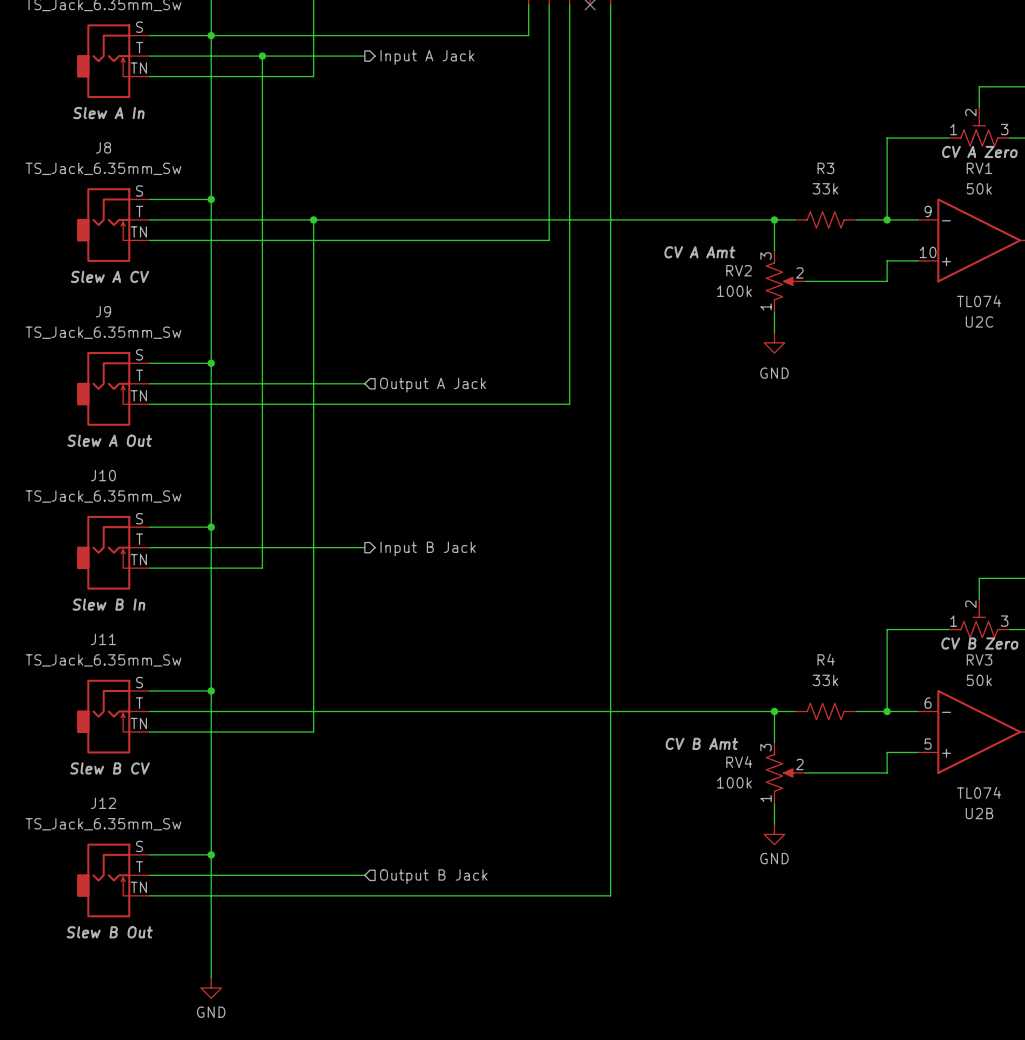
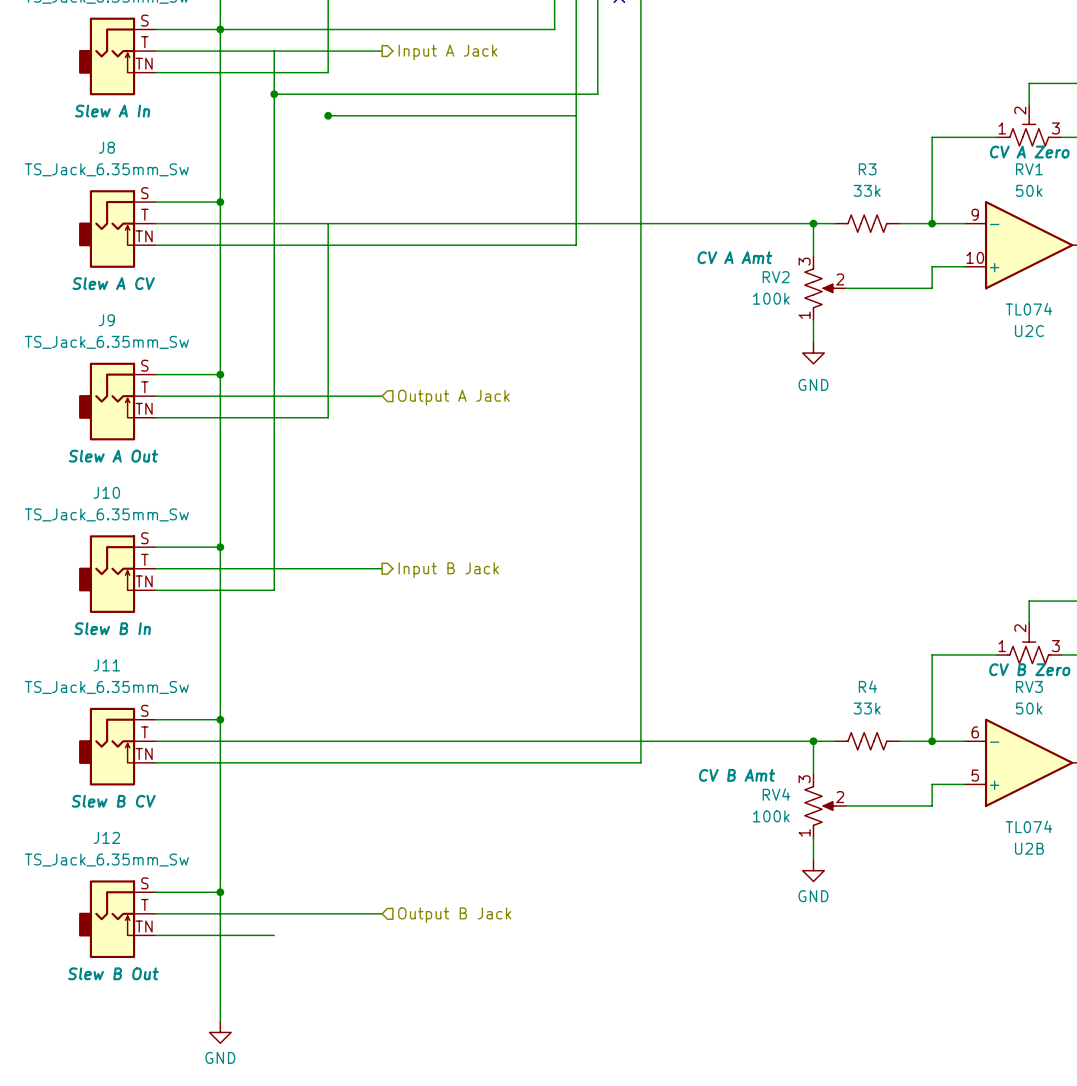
junction: (262, 56) -> none
junction: none -> (274, 94)
wire: (569, 97) (569, 404) (313, 404) (313, 731) -> (597, 94) (274, 94)
wire: none -> (328, 115) (576, 115)
junction: none -> (328, 115)
junction: (313, 219) -> none
wire: (610, 731) (610, 895) (262, 895) -> (640, 762) (328, 762)

